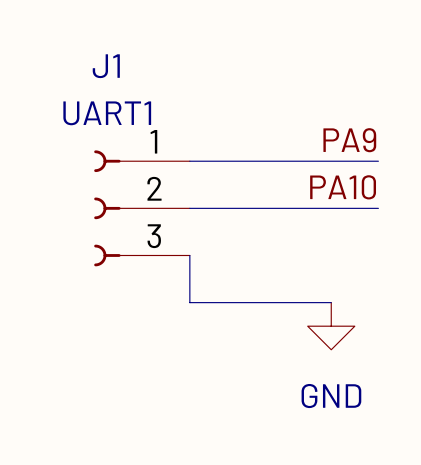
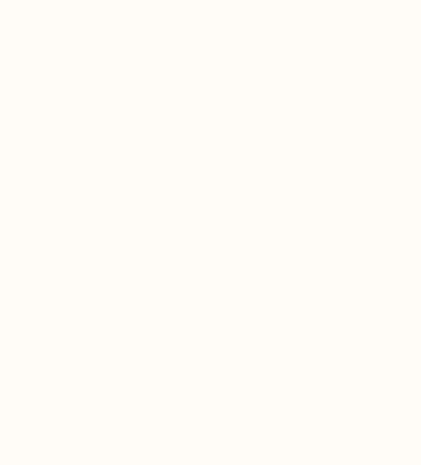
label: PA9 (349, 140) -> none
wire: (189, 161) (378, 161) -> none
label: PA10 (343, 187) -> none
J1: UART1 (142, 208) -> none
wire: (189, 208) (378, 208) -> none
wire: (189, 255) (189, 302) (331, 302) -> none
power symbol: GND (331, 326) -> none

